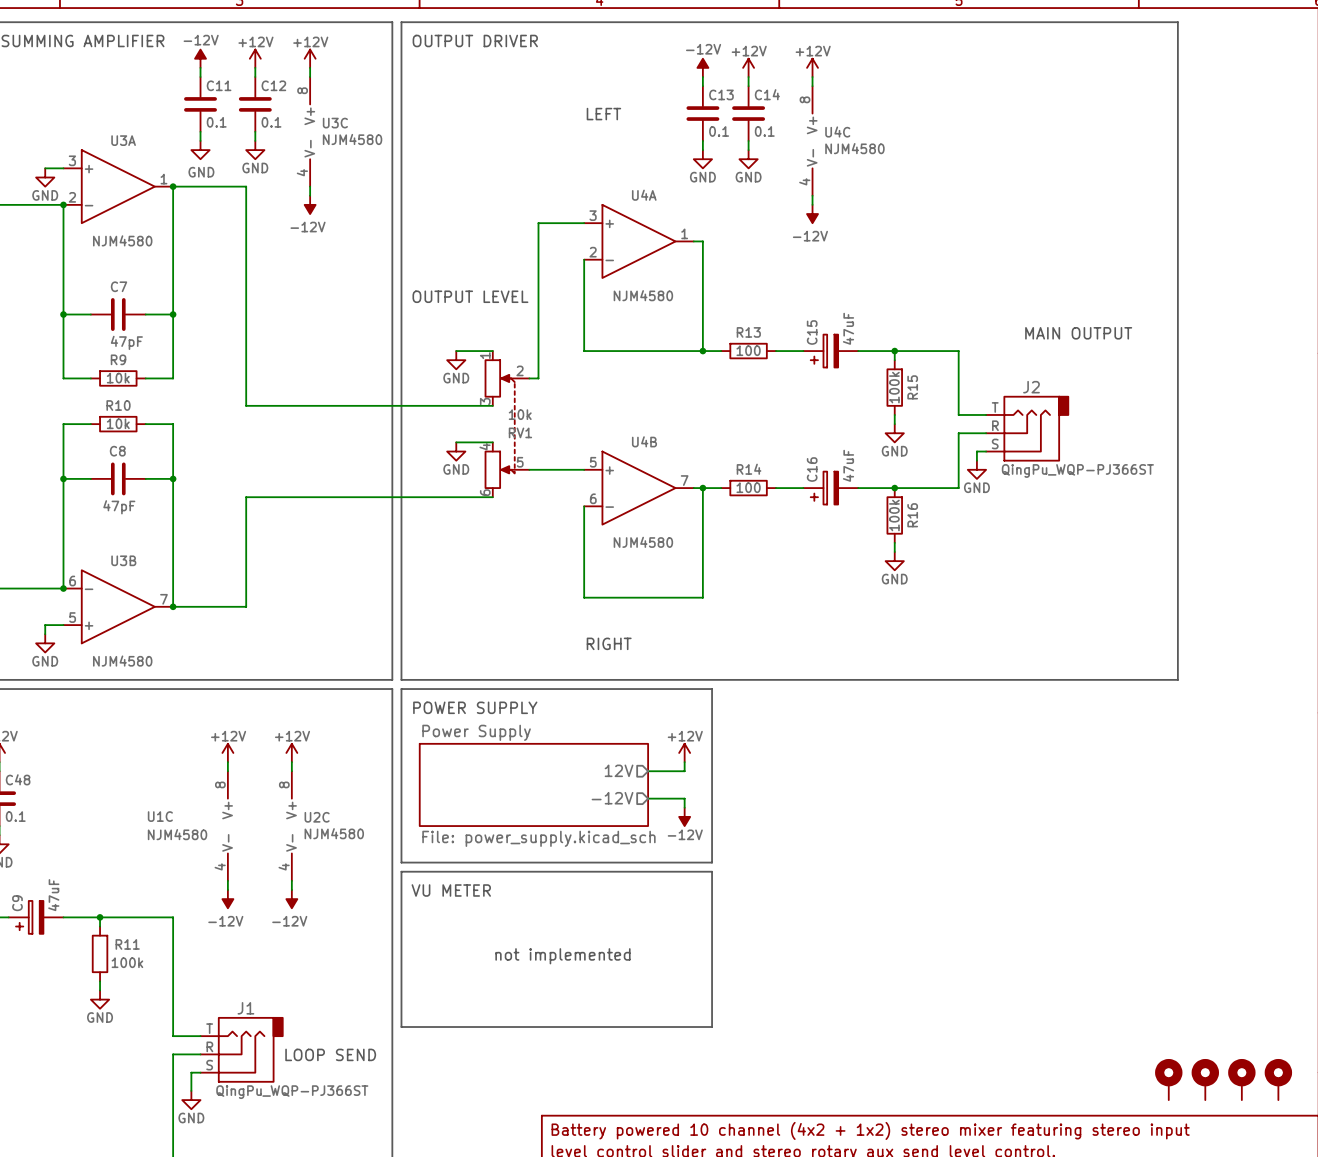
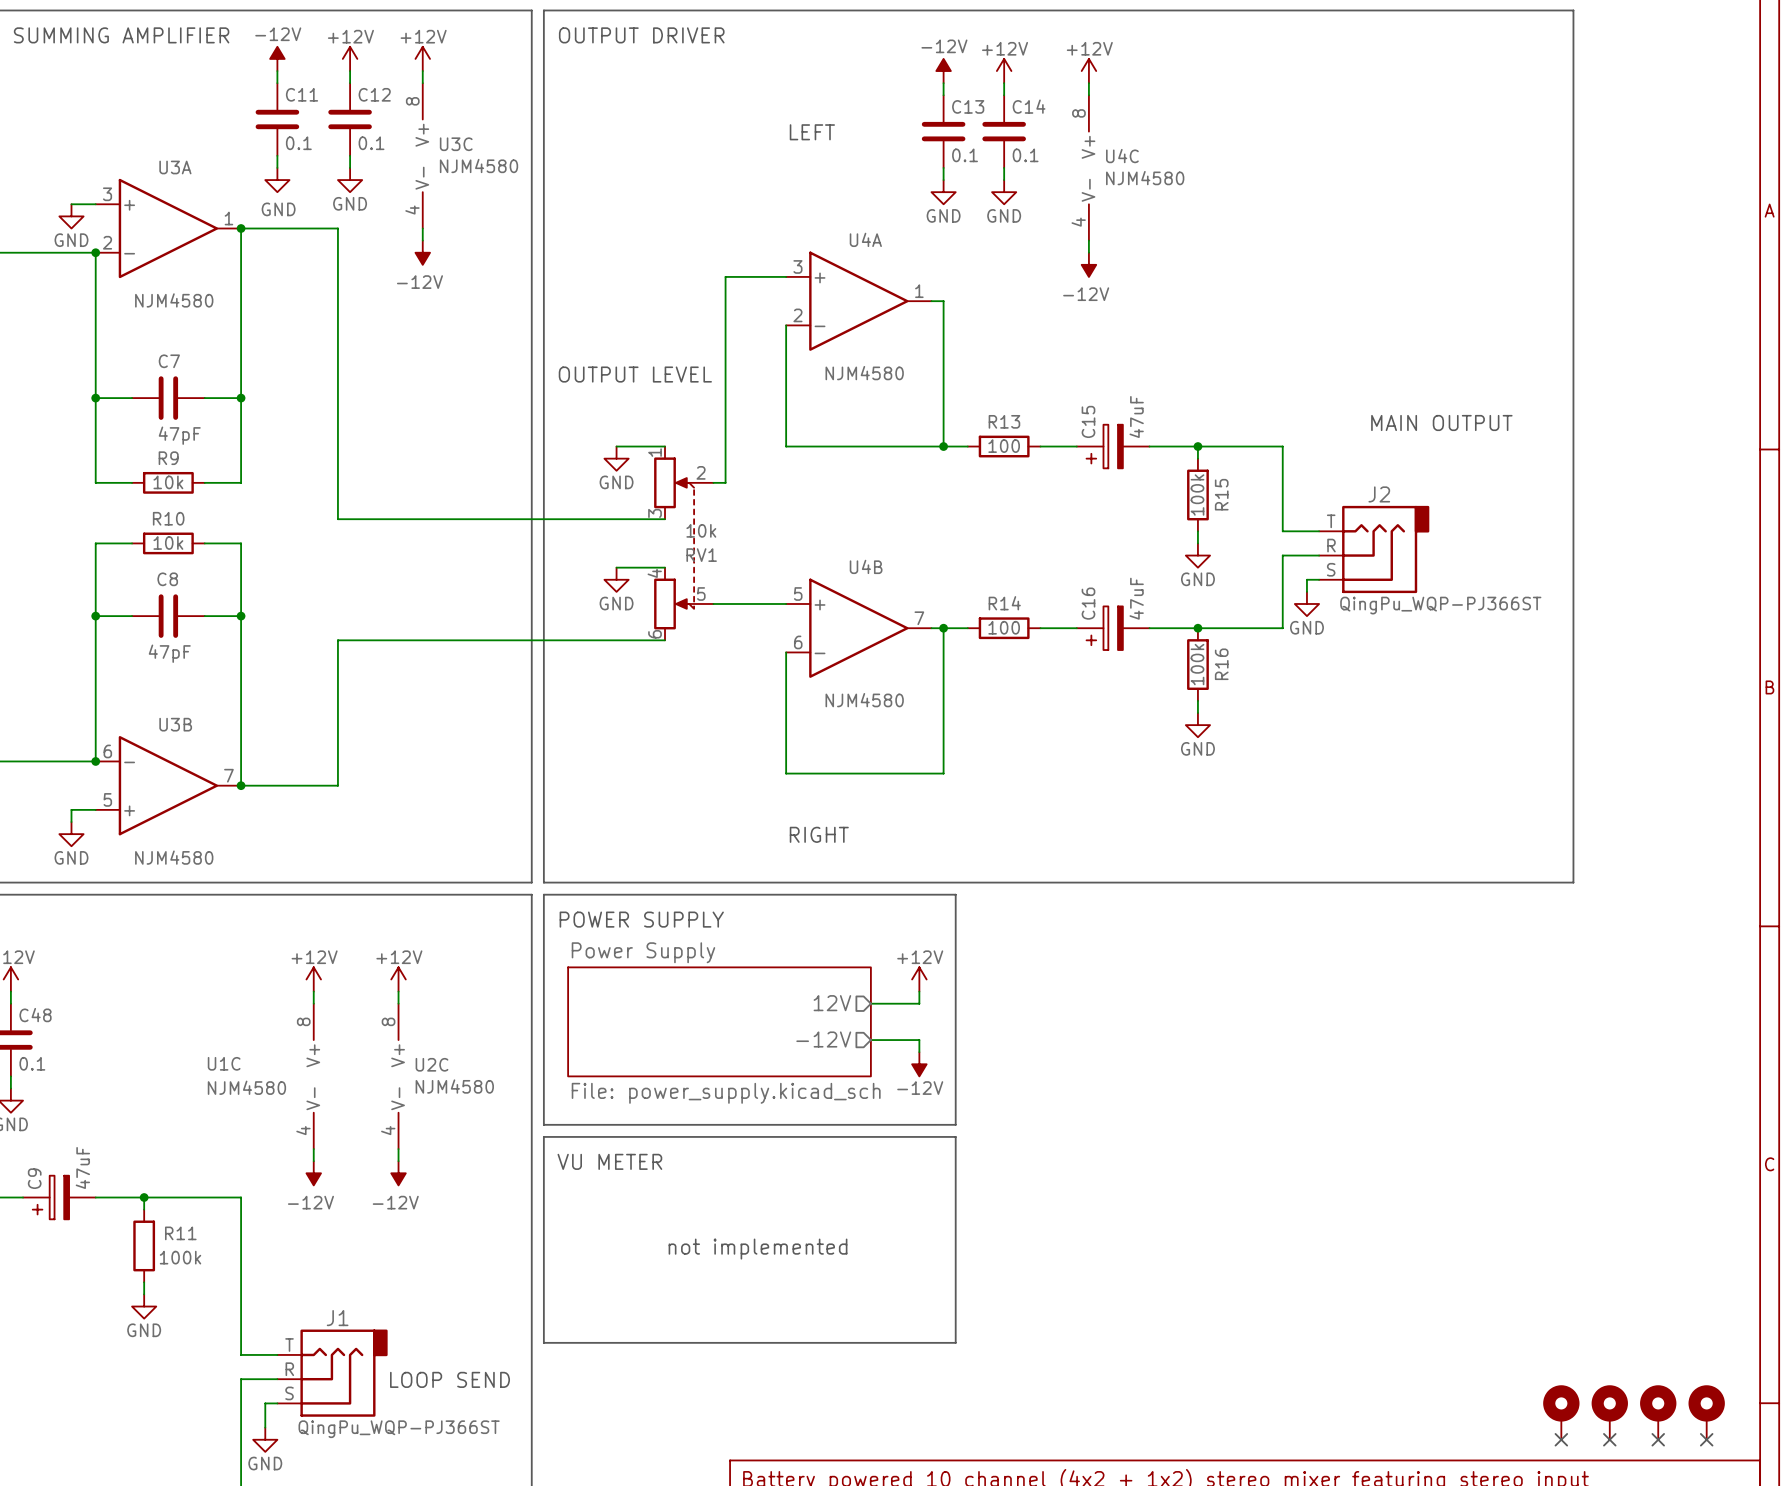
no-connect mark: none -> (1561, 1439)
no-connect mark: none -> (1609, 1439)
no-connect mark: none -> (1658, 1439)
no-connect mark: none -> (1706, 1439)

